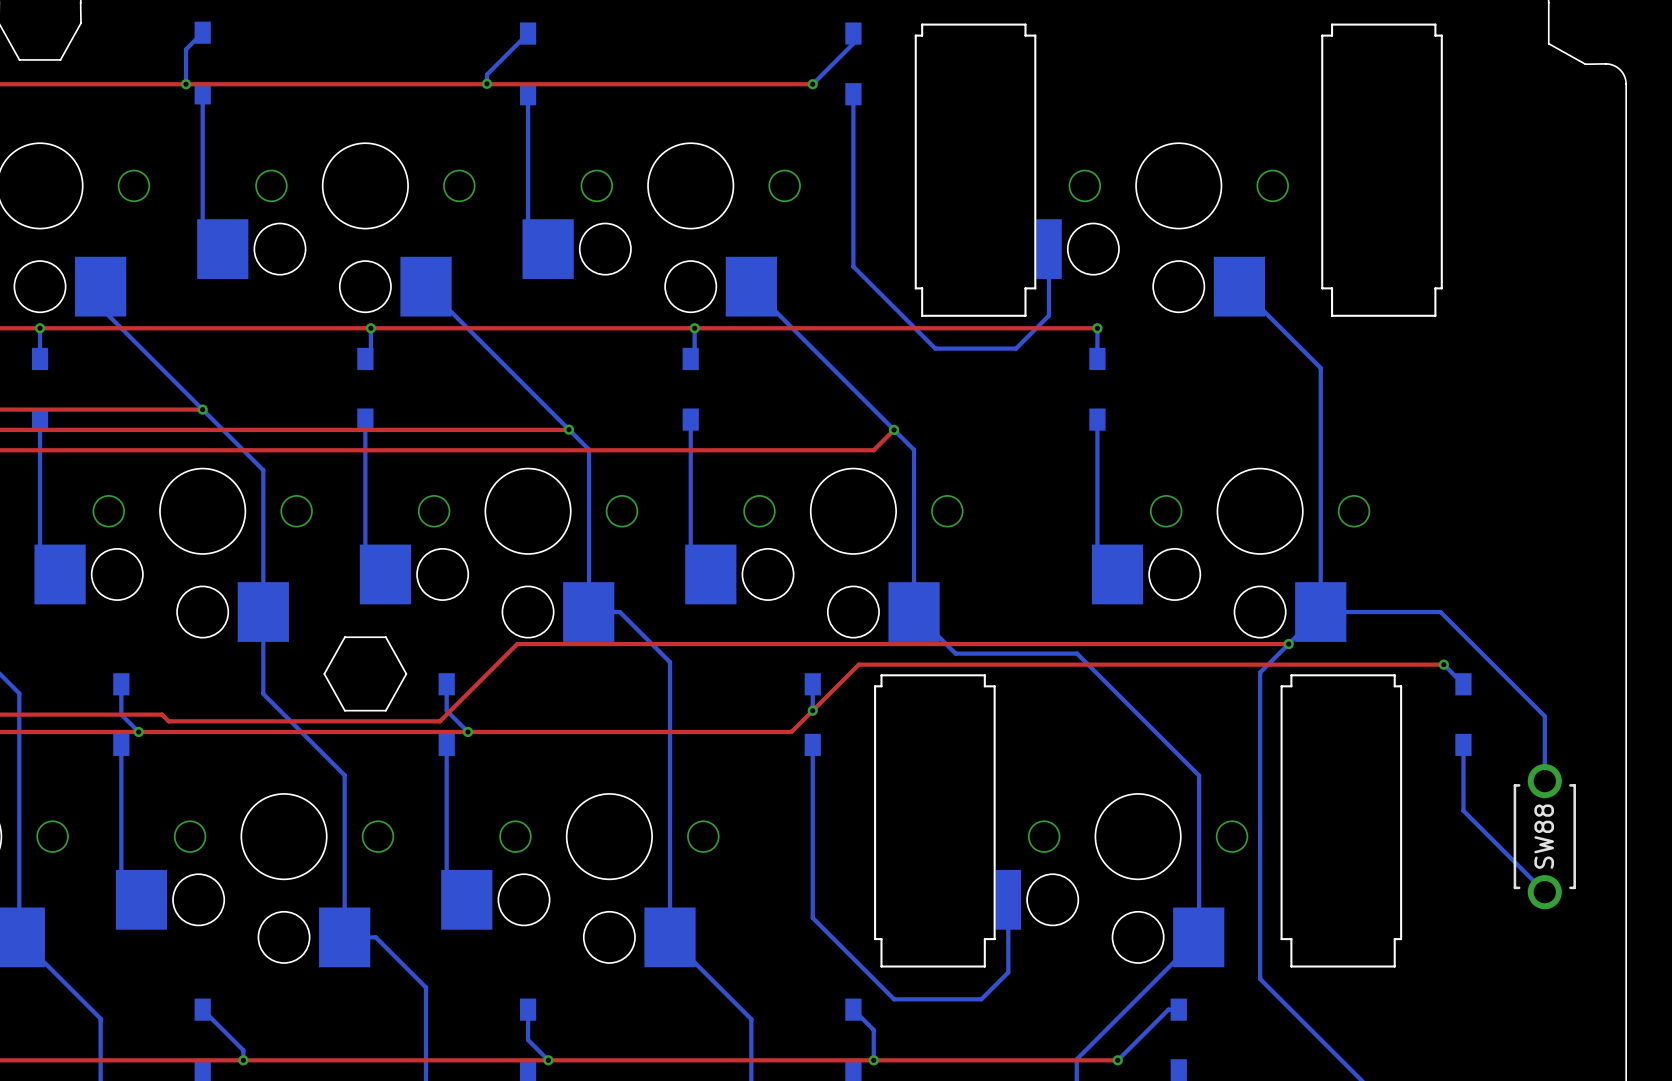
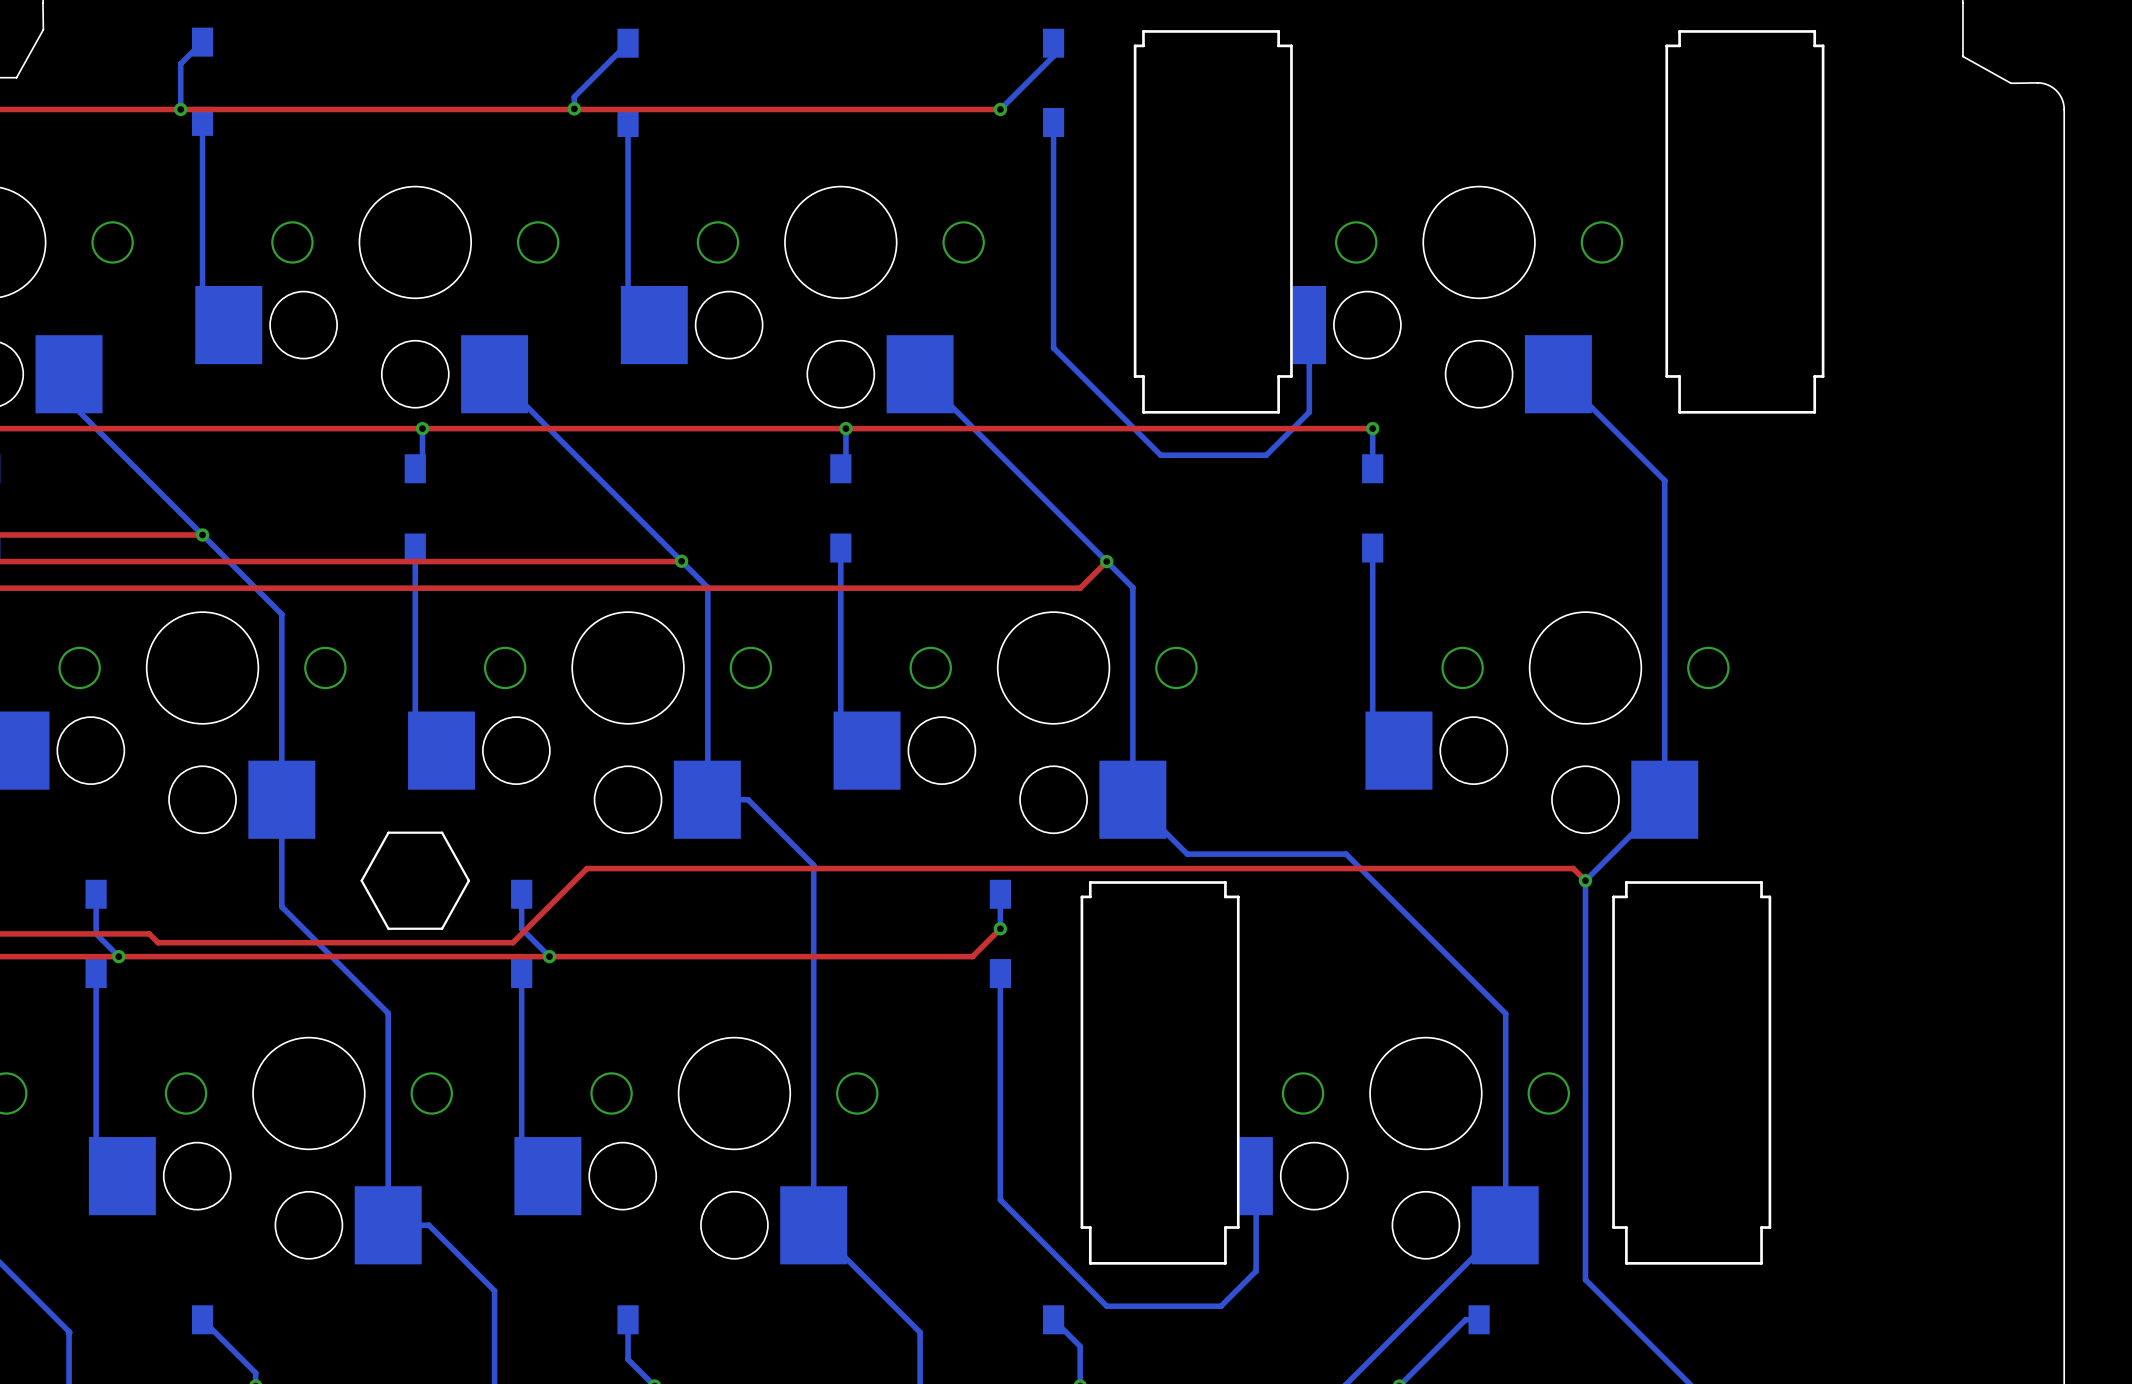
top track: (1288, 644) (517, 644) (496, 664) -> none
via position: (1288, 644) -> (1585, 880)
top track: (858, 664) (812, 710) -> (1060, 868) (587, 868)
top track: (1250, 664) (1443, 664) -> (1573, 868) (1585, 880)
bottom track: (1443, 664) (1463, 684) -> none
via: (1443, 664) -> none
bottom track: (1260, 673) (1320, 612) (1440, 612) (1544, 716) (1544, 781) -> (1585, 880) (1664, 799)
part: (1463, 714) -> none
bottom track: (1463, 744) (1463, 810) (1544, 892) -> none
SW88: (1544, 836) -> none

